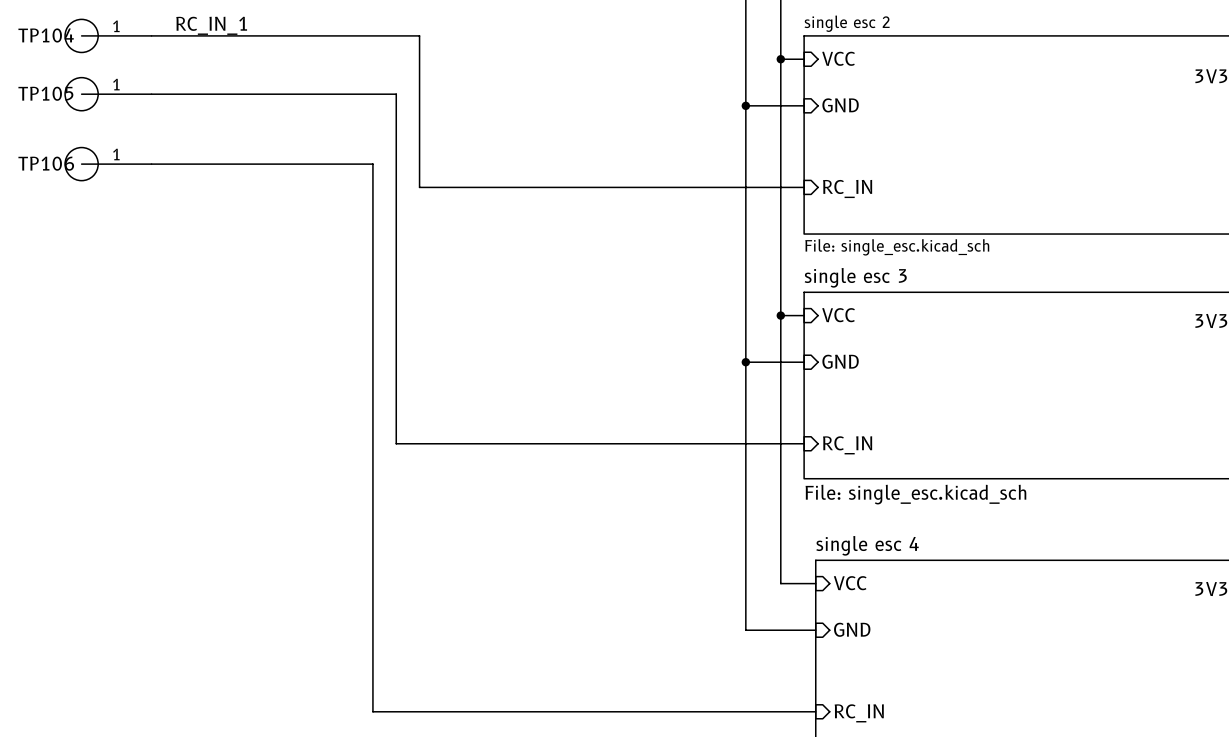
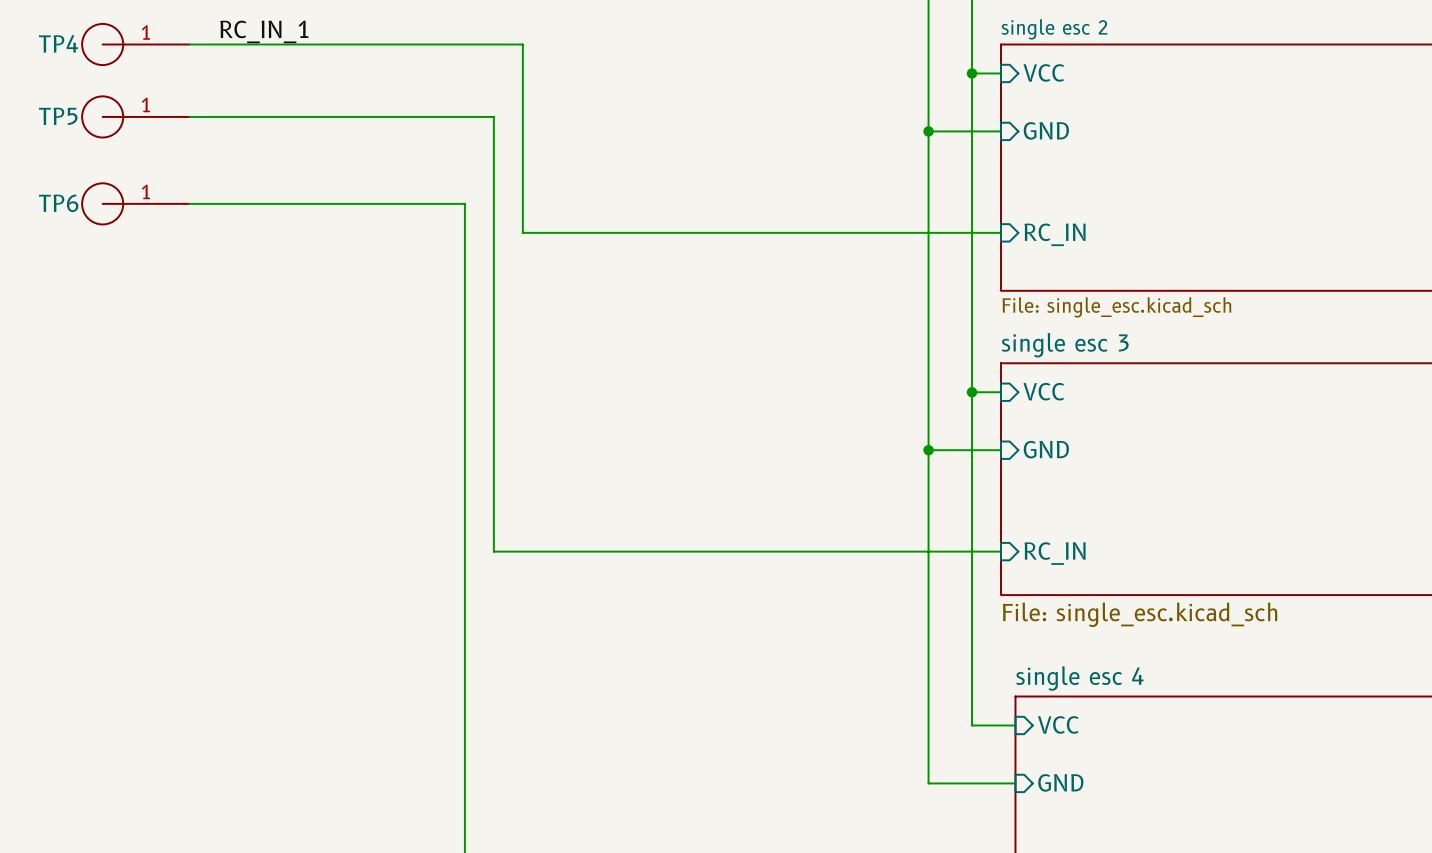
TP104 name: TP104 (46, 35) -> TP4 (58, 43)
TP105 name: TP105 (45, 93) -> TP5 (58, 116)
TP106 name: TP106 (46, 163) -> TP6 (58, 203)

